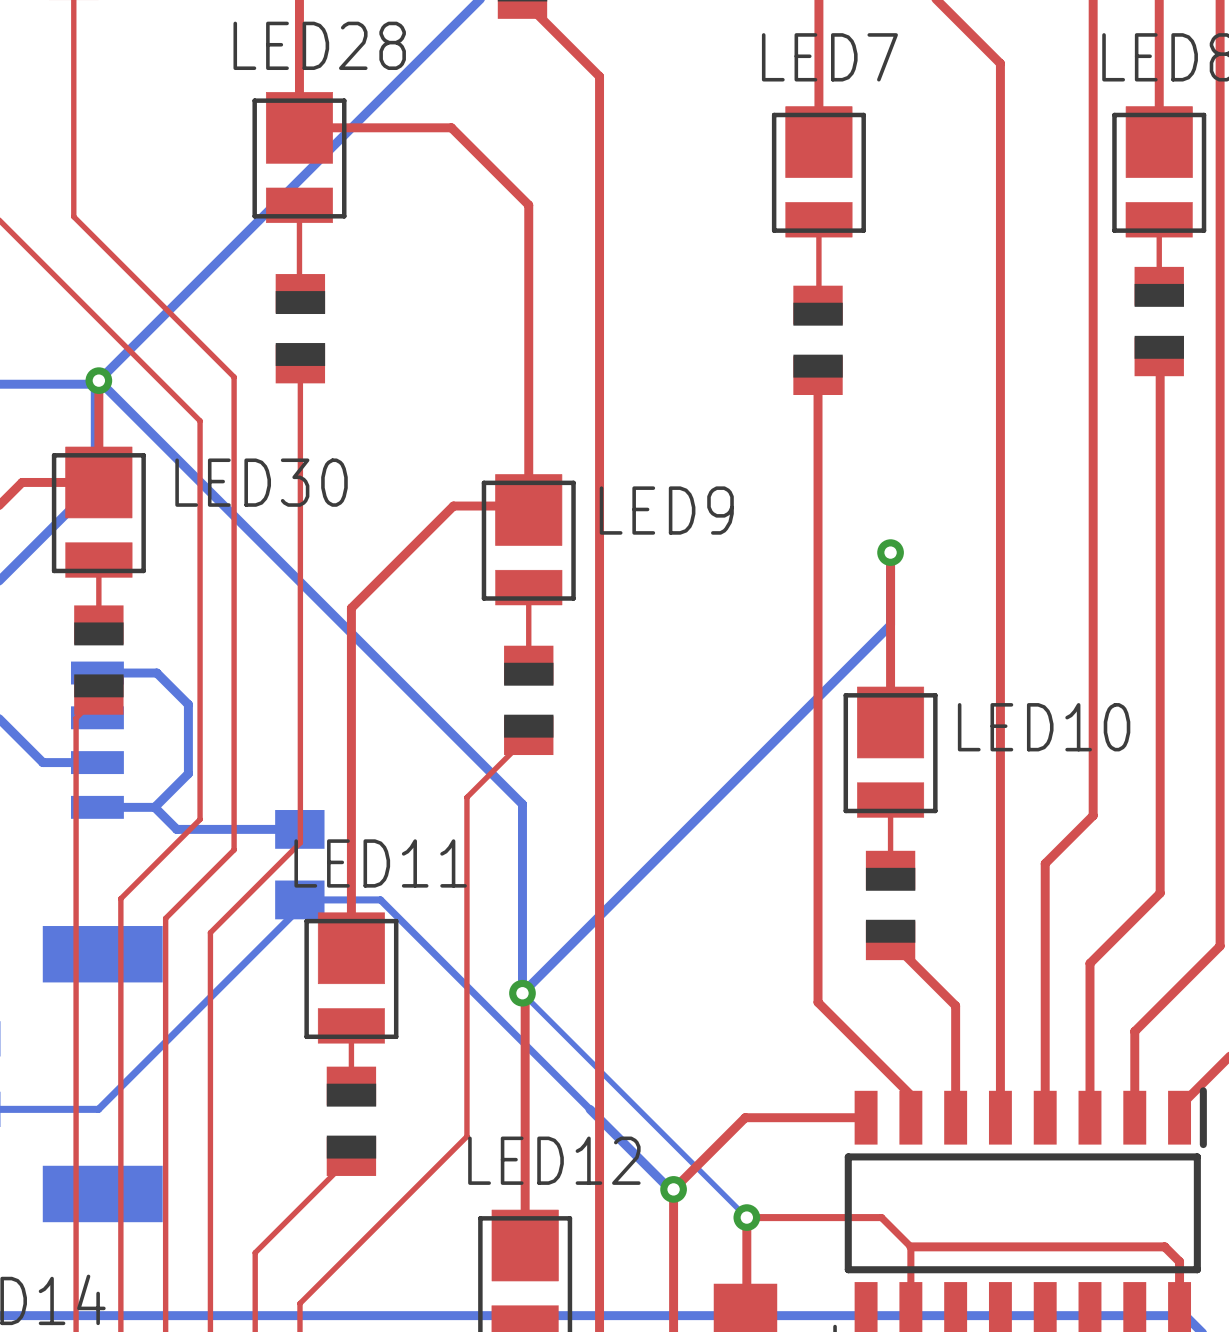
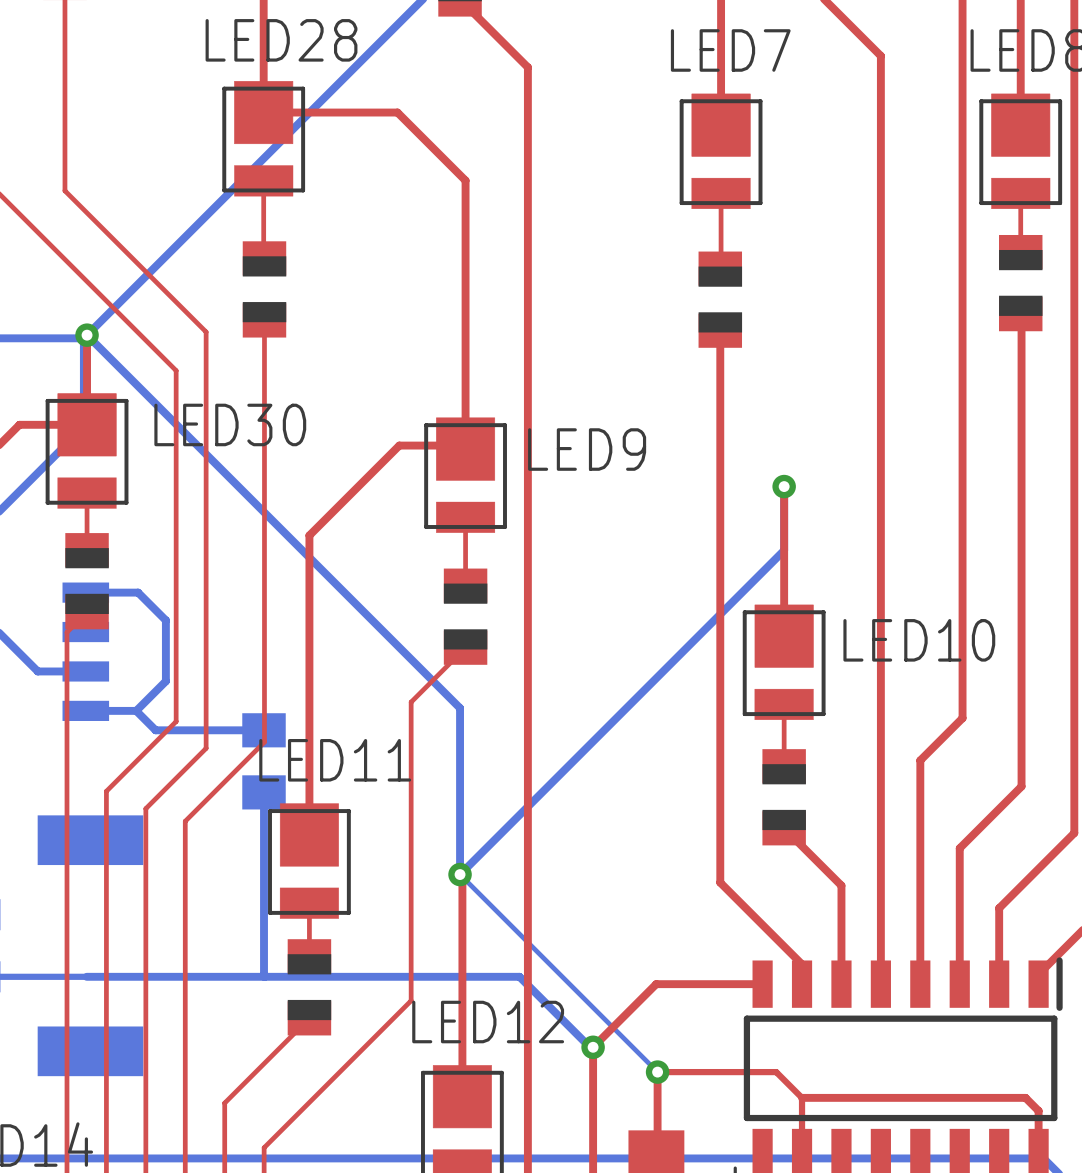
bottom track: (299, 899) (380, 899) (590, 1109) -> (264, 792) (264, 976)
bottom track: (307, 899) (98, 1109) -> (519, 976) (86, 976)

